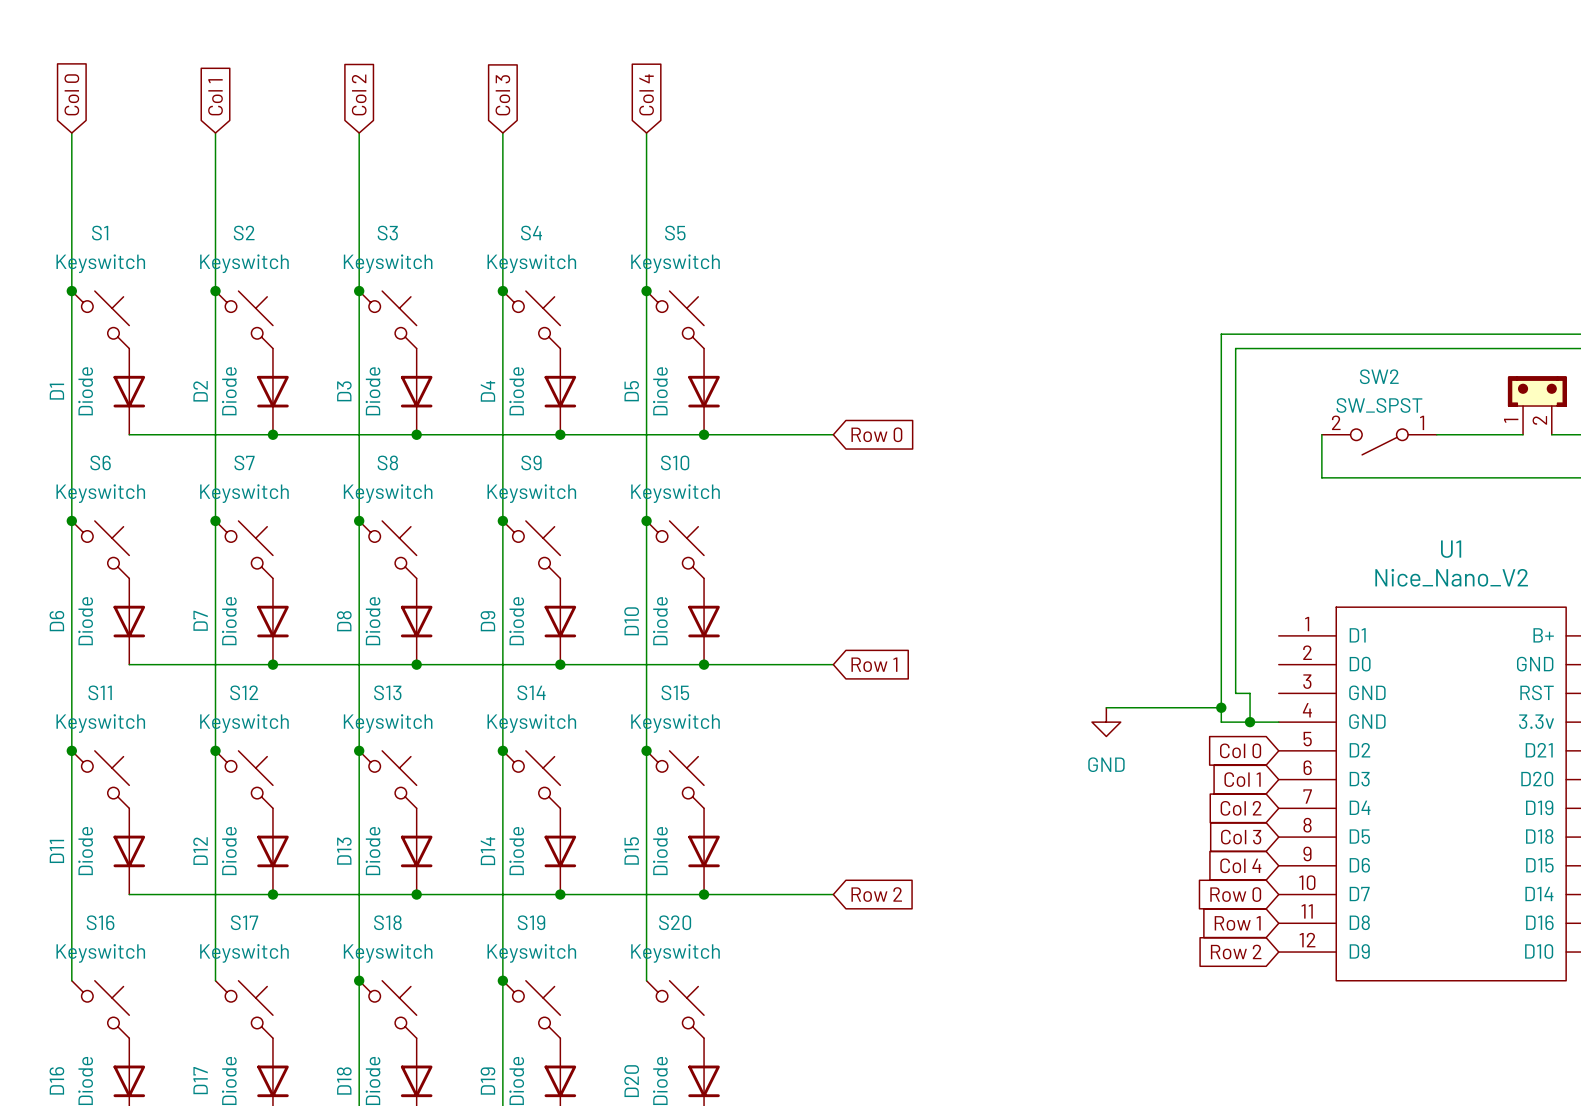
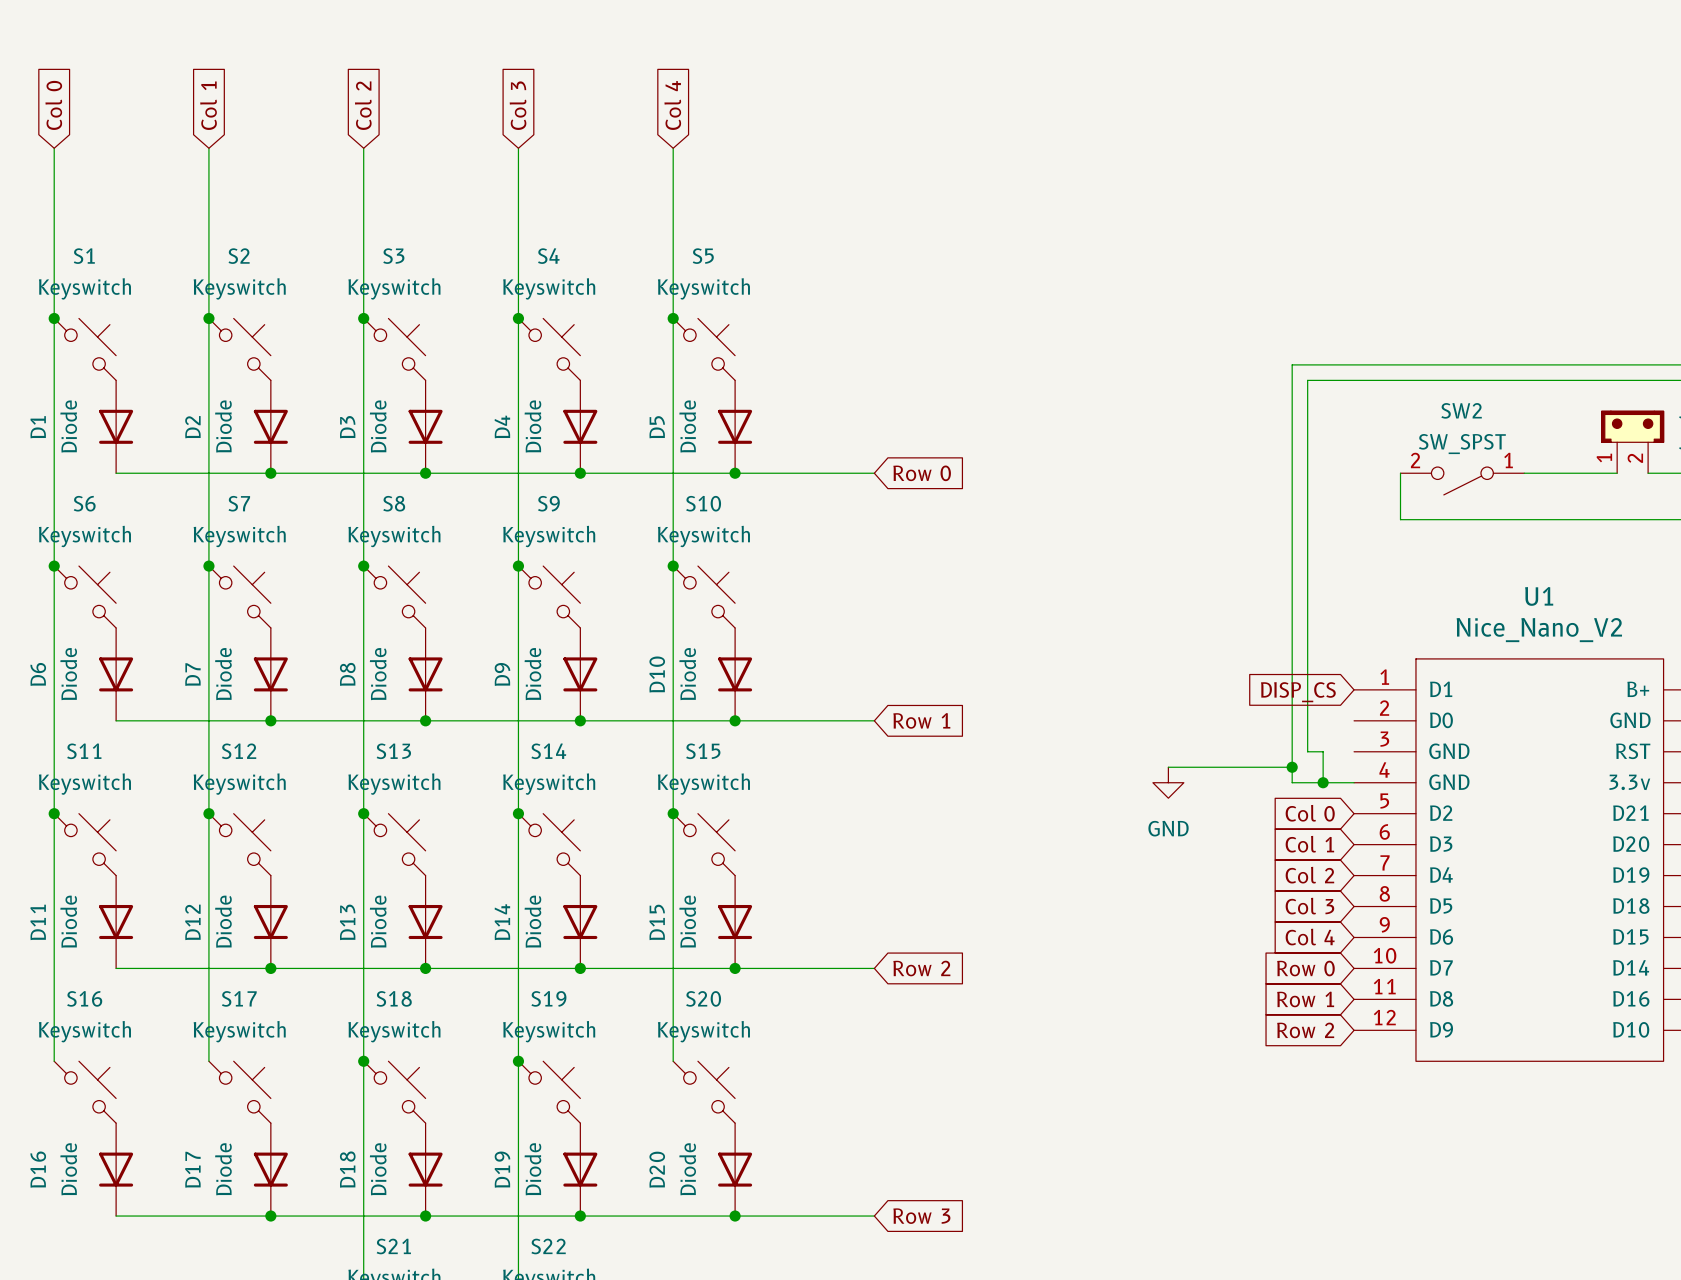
global label: none -> DISP_CS (1298, 692)

